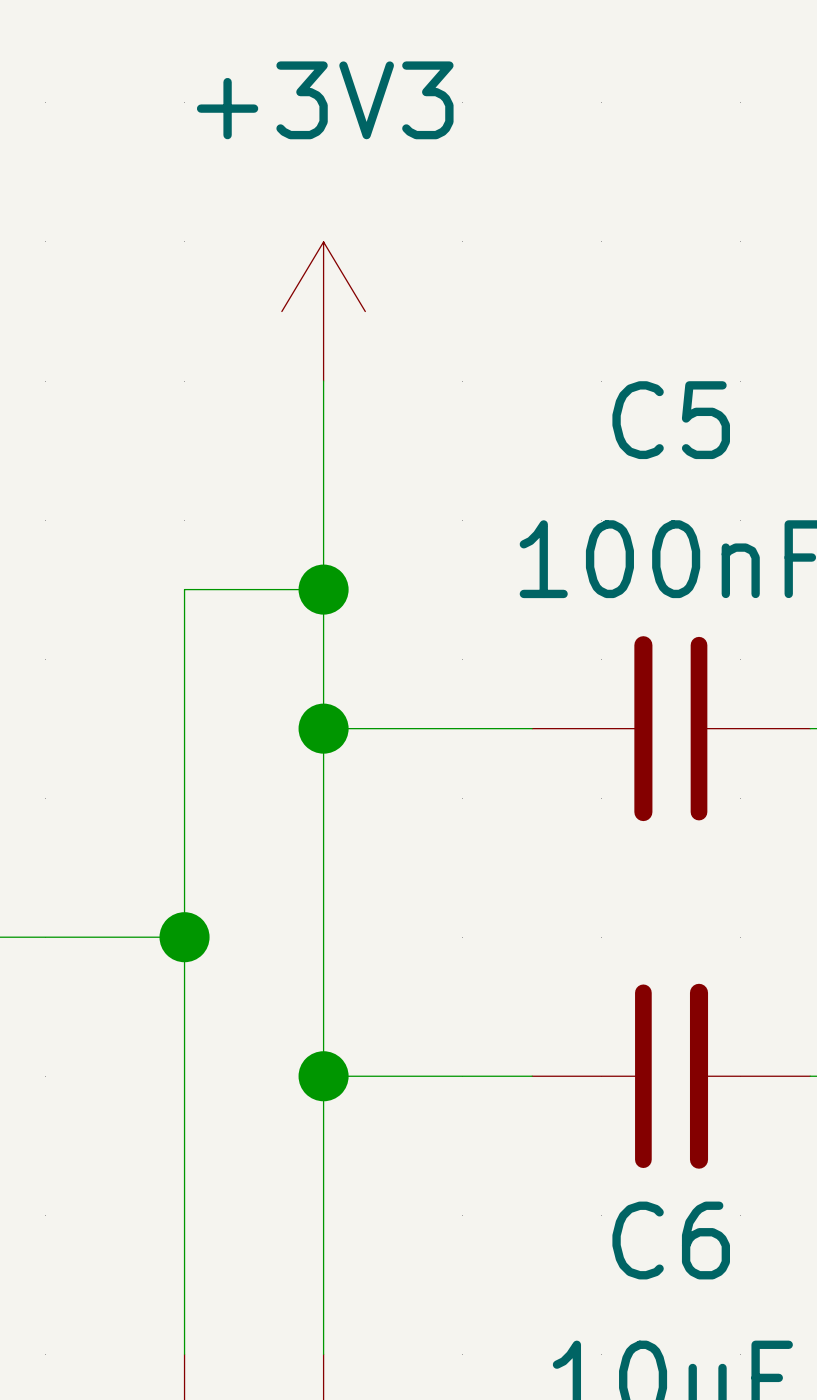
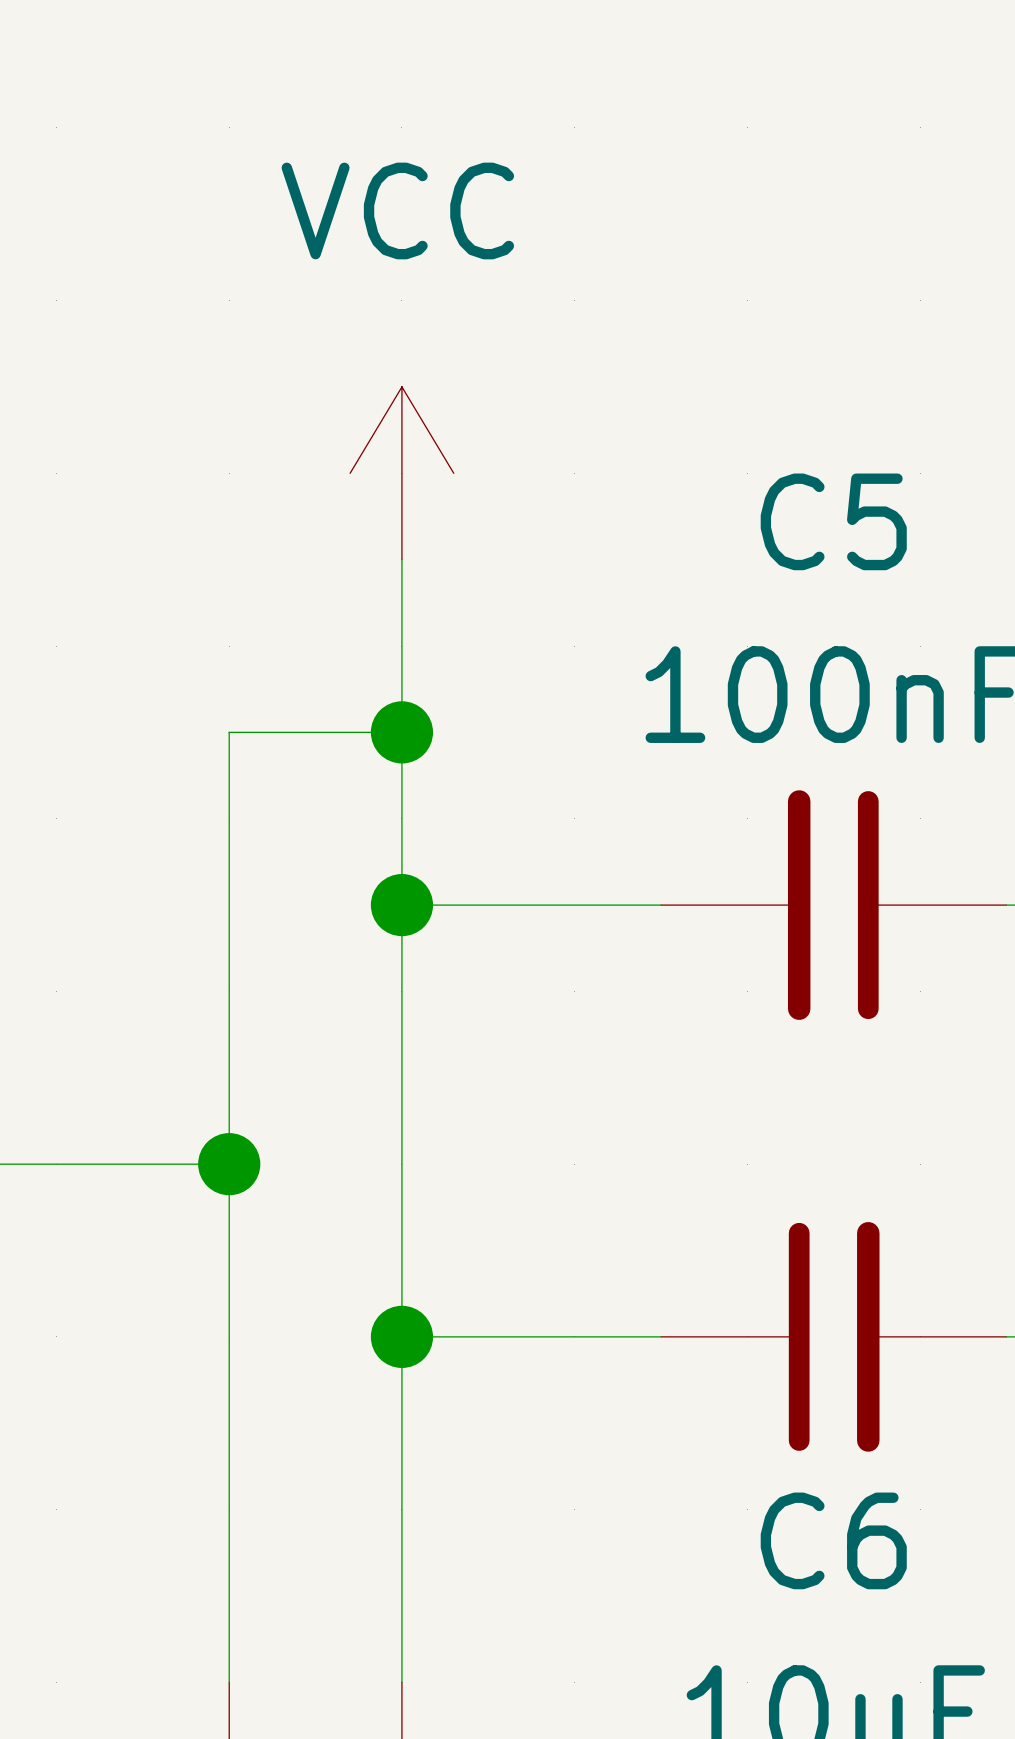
power symbol: +3V3 (323, 311) -> none
power symbol: none -> VCC (401, 473)

